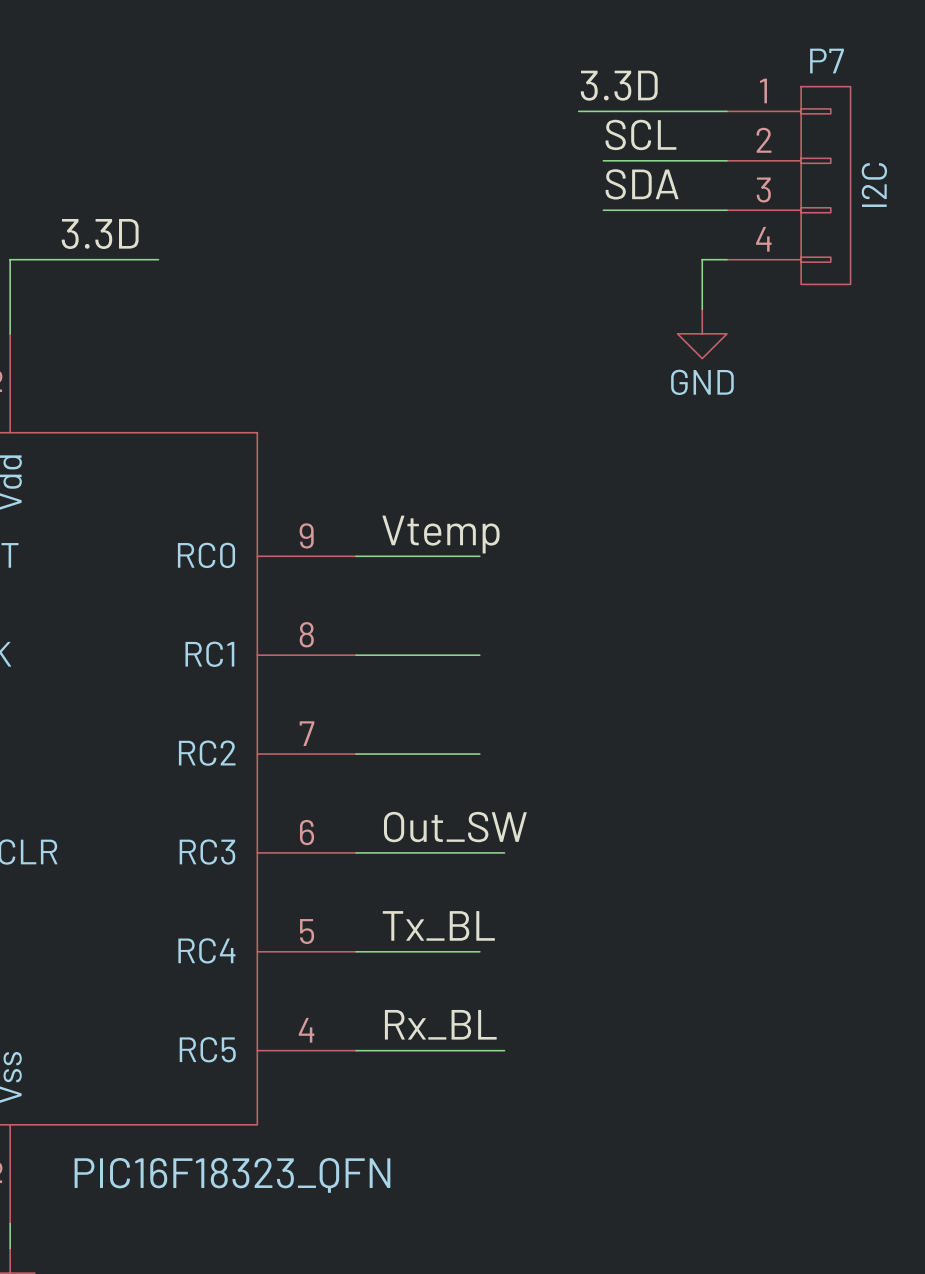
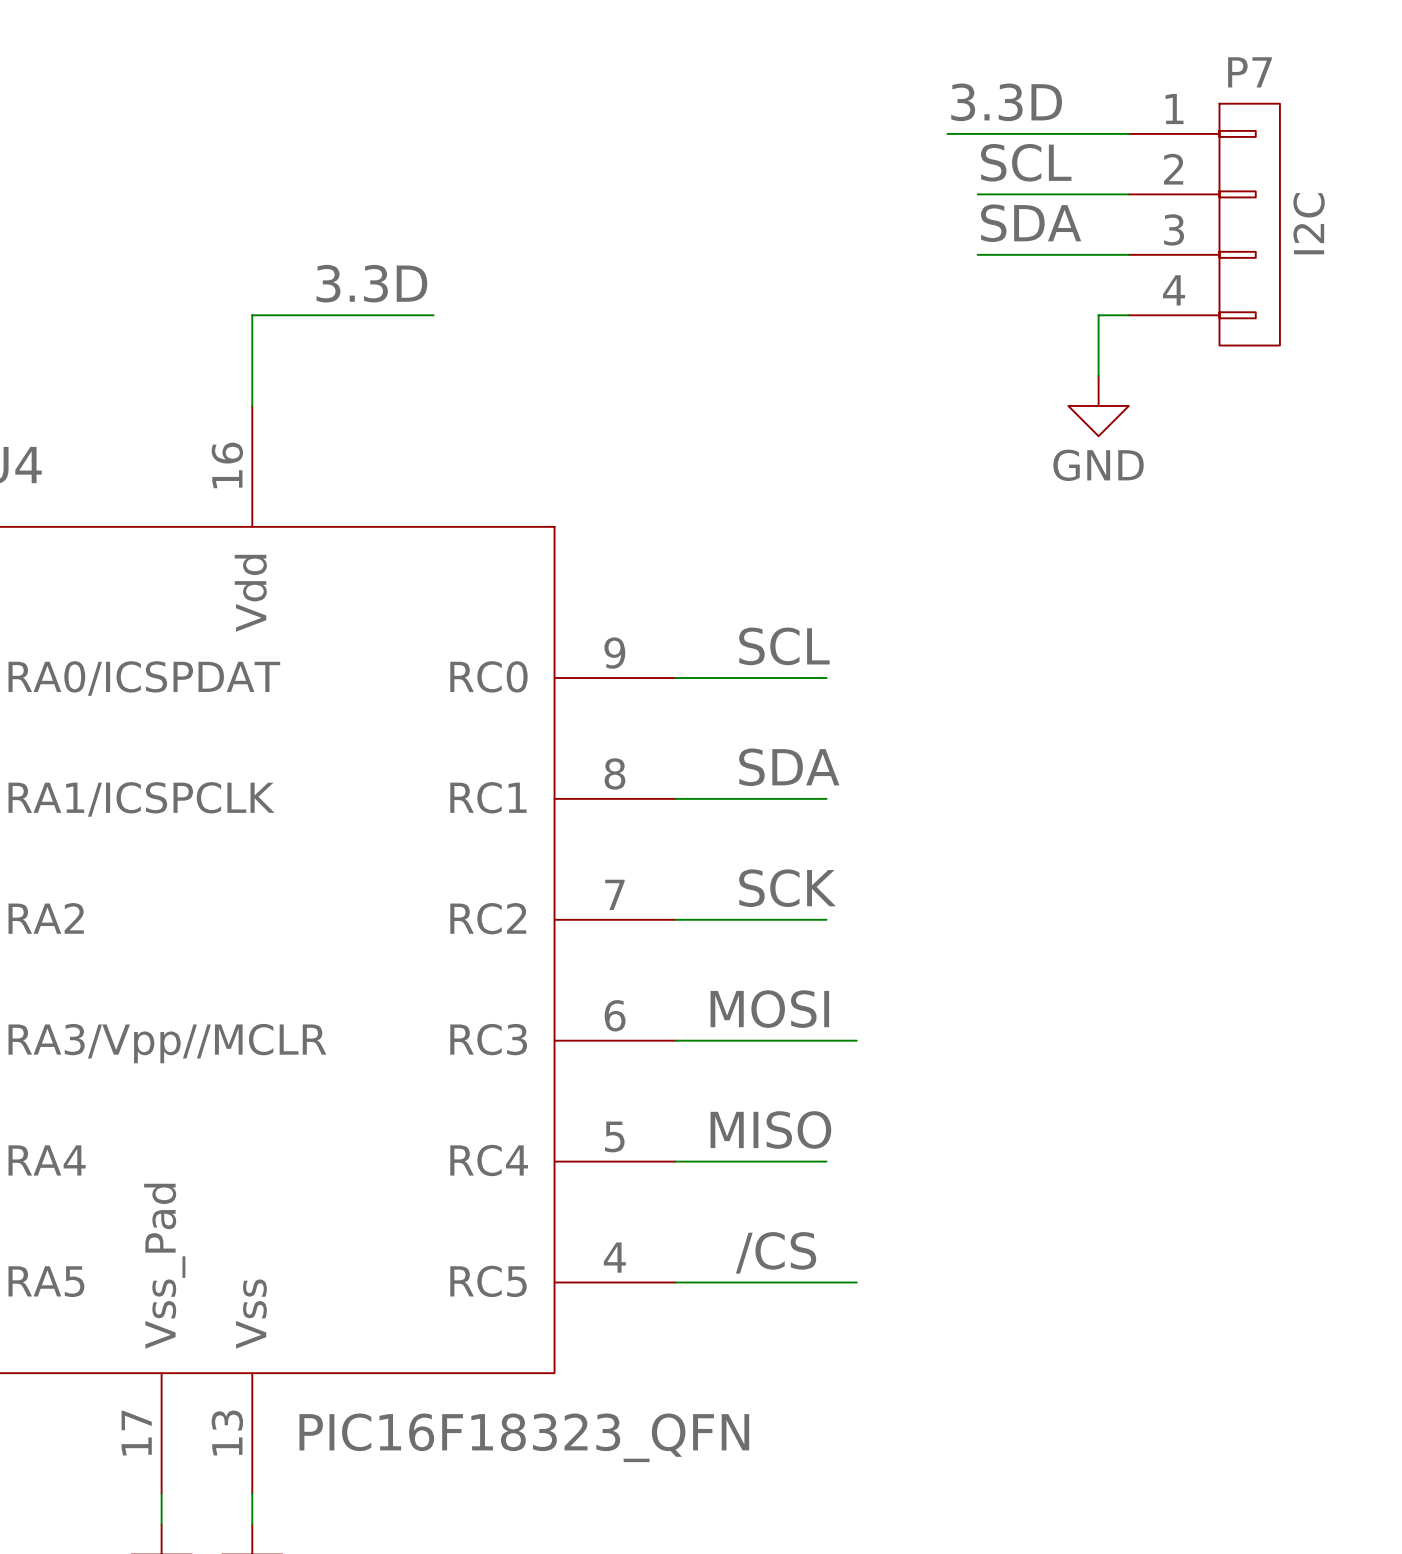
label: none -> SCL (784, 646)
label: Vtemp (441, 534) -> none
label: none -> SDA (789, 767)
label: none -> SCK (787, 888)
label: Out_SW (455, 827) -> MOSI (769, 1009)
label: Tx_BL (438, 925) -> MISO (770, 1129)
label: none -> /CS (776, 1252)
label: Rx_BL (440, 1024) -> none

